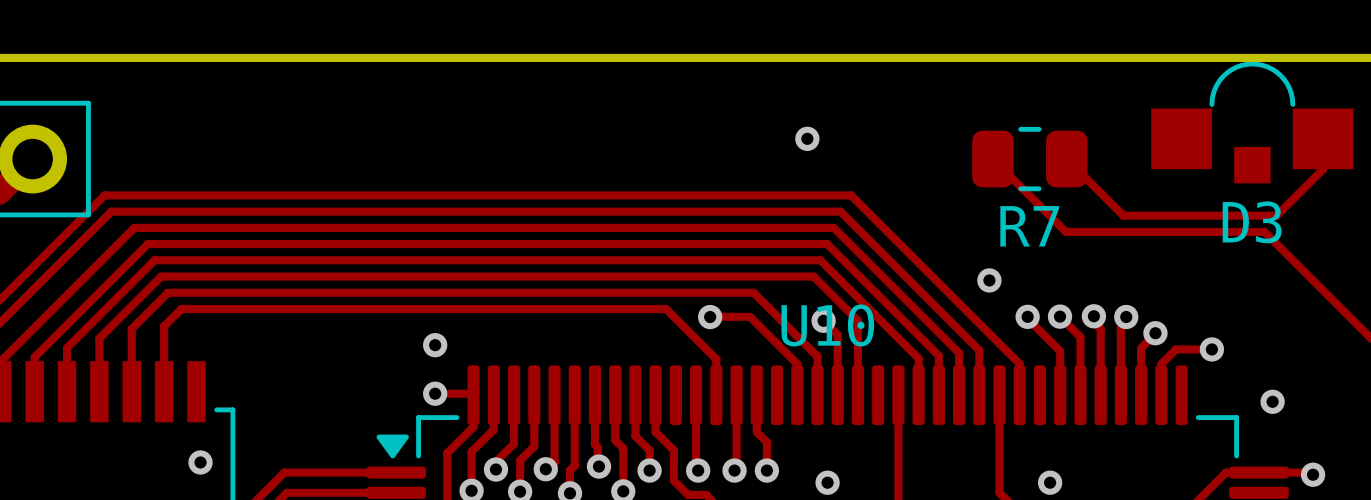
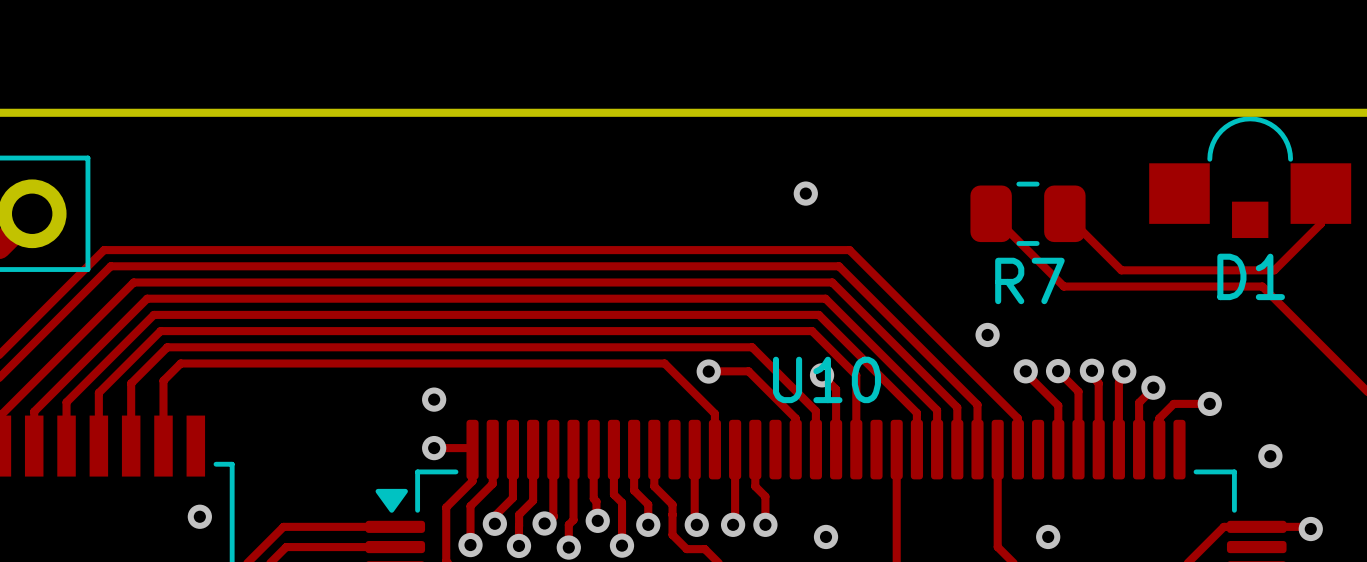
D3 name: D3 (1252, 222) -> D1 (1251, 276)

